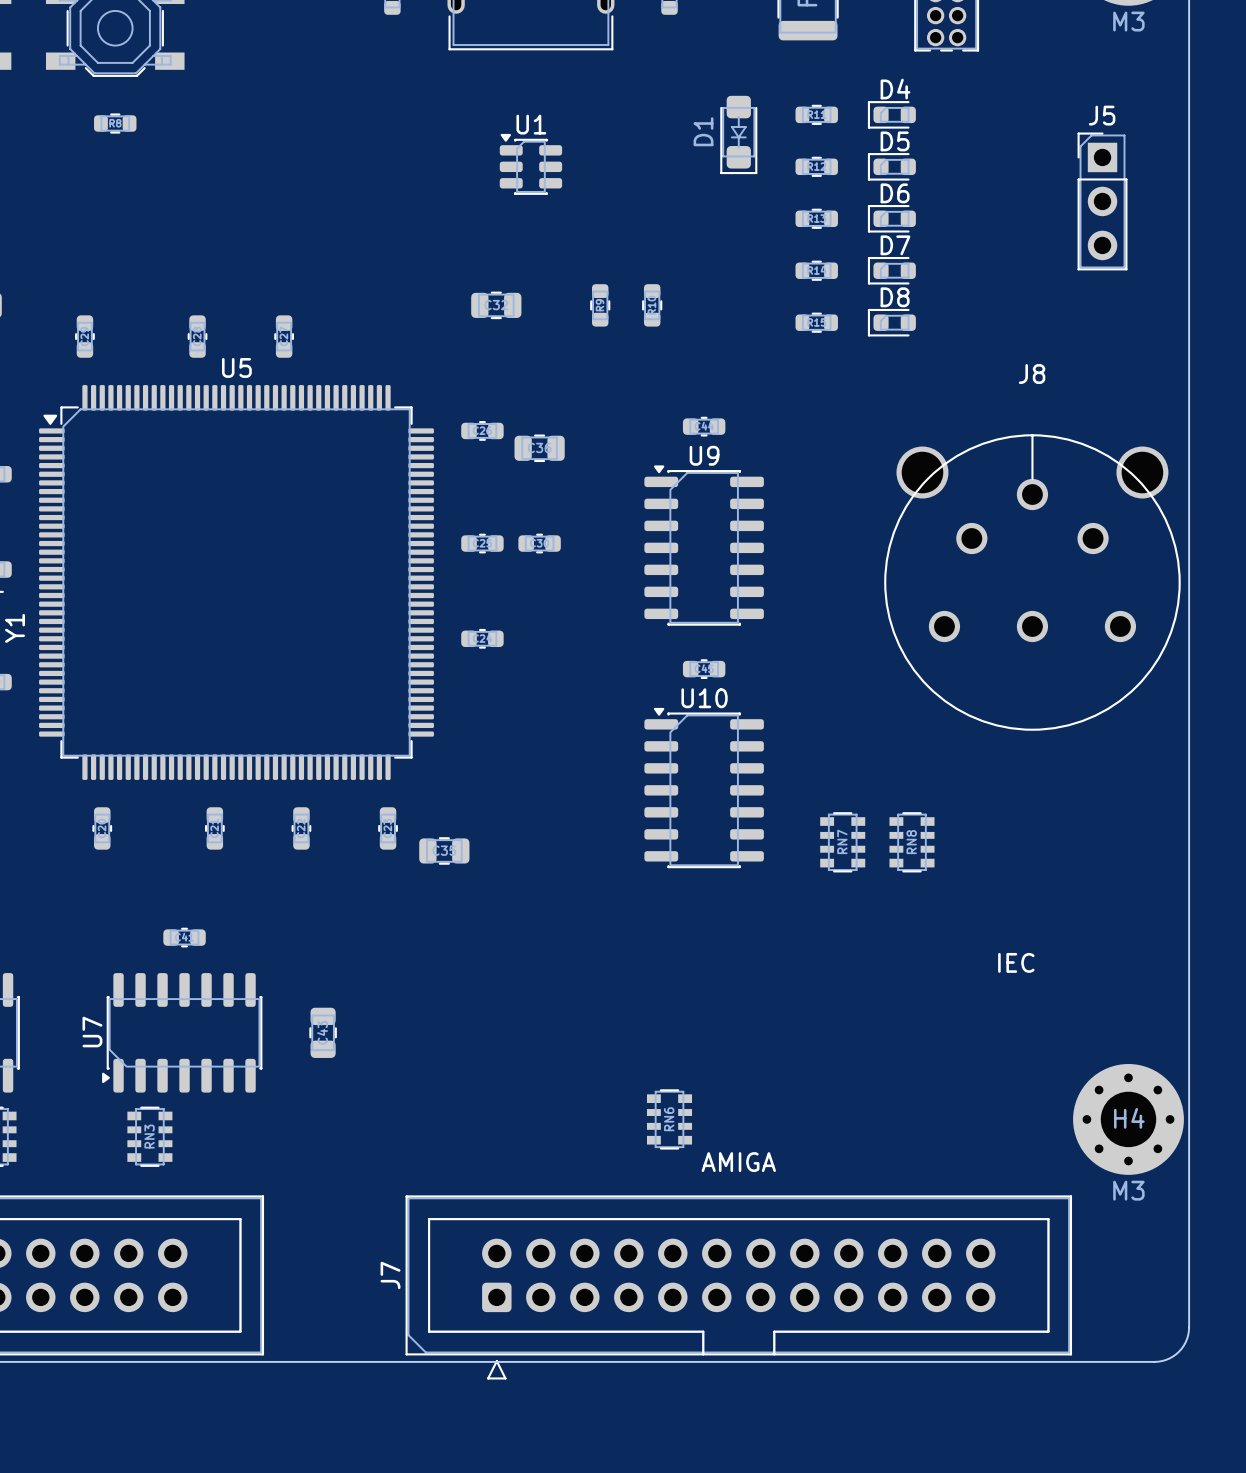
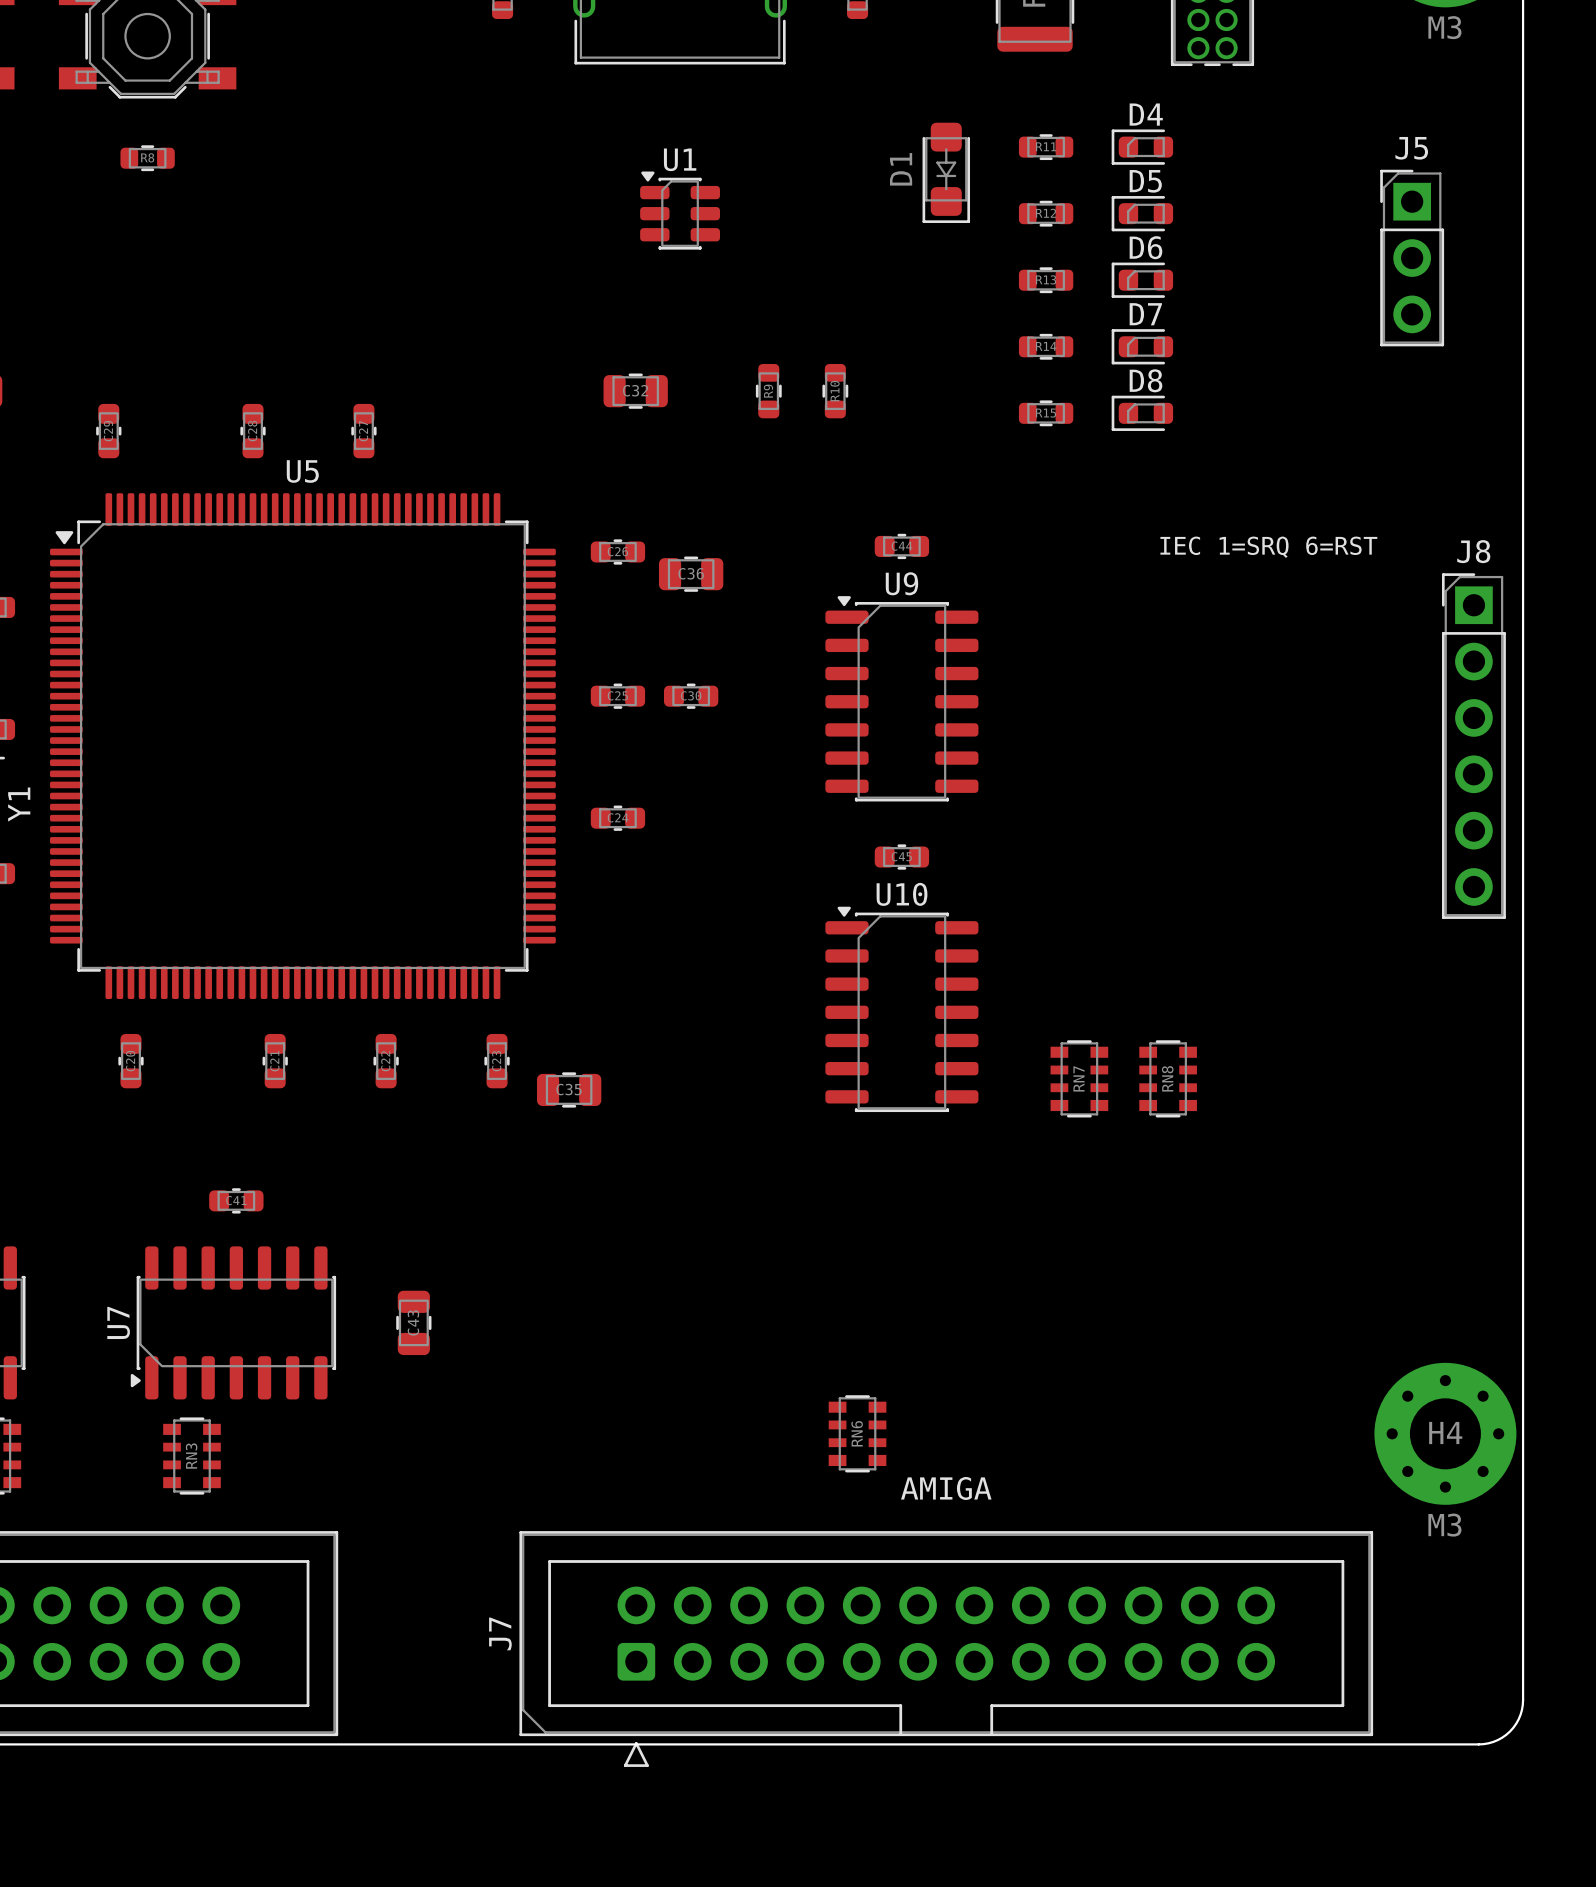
J8 name position: J8 (1032, 374) -> J8 (1473, 551)
text: none -> IEC 1=SRQ 6=RST (1268, 547)
J8 footprint: [884, 434, 1181, 731] -> [1441, 573, 1506, 919]
text: IEC (1016, 962) -> none

